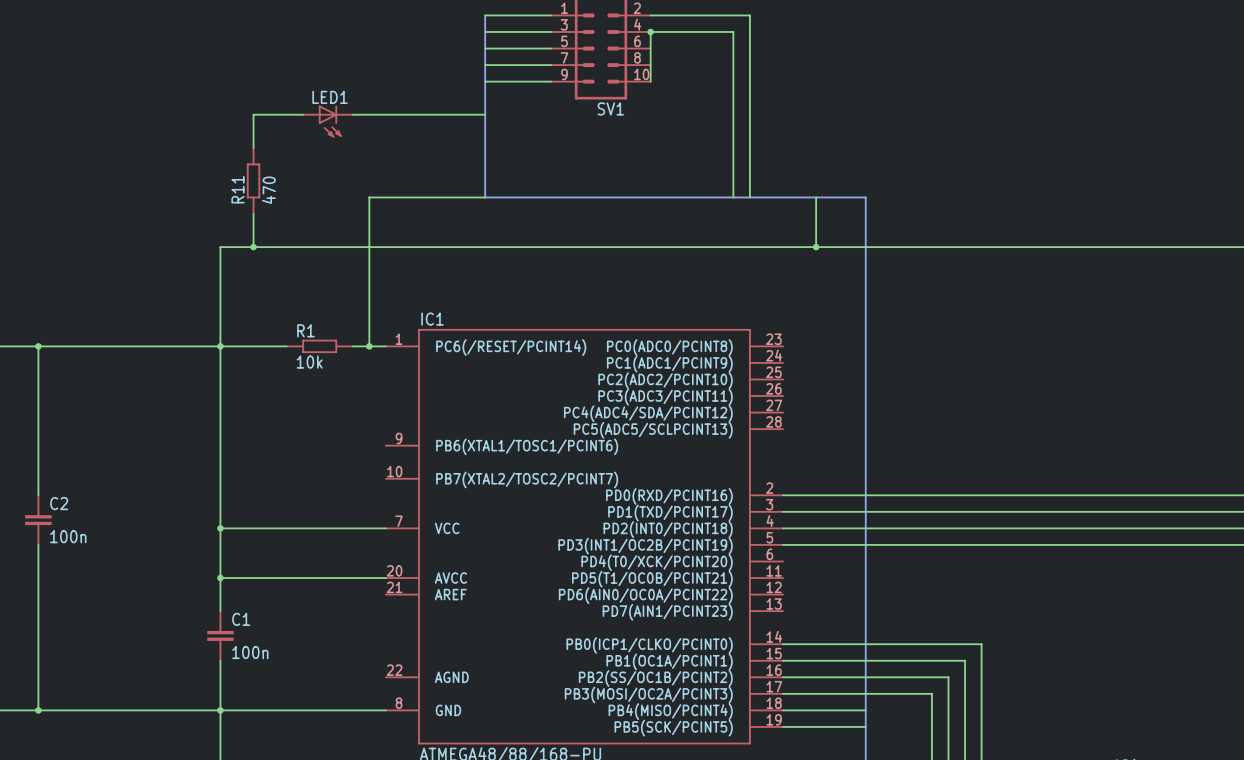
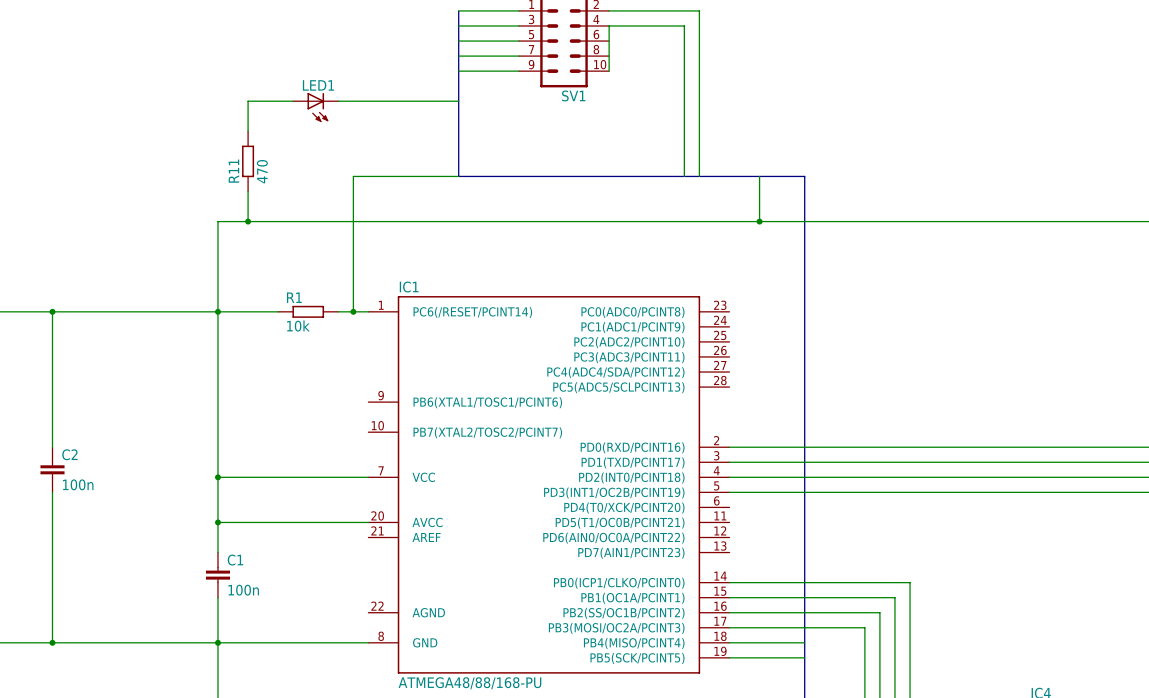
junction: (650, 31) -> none

